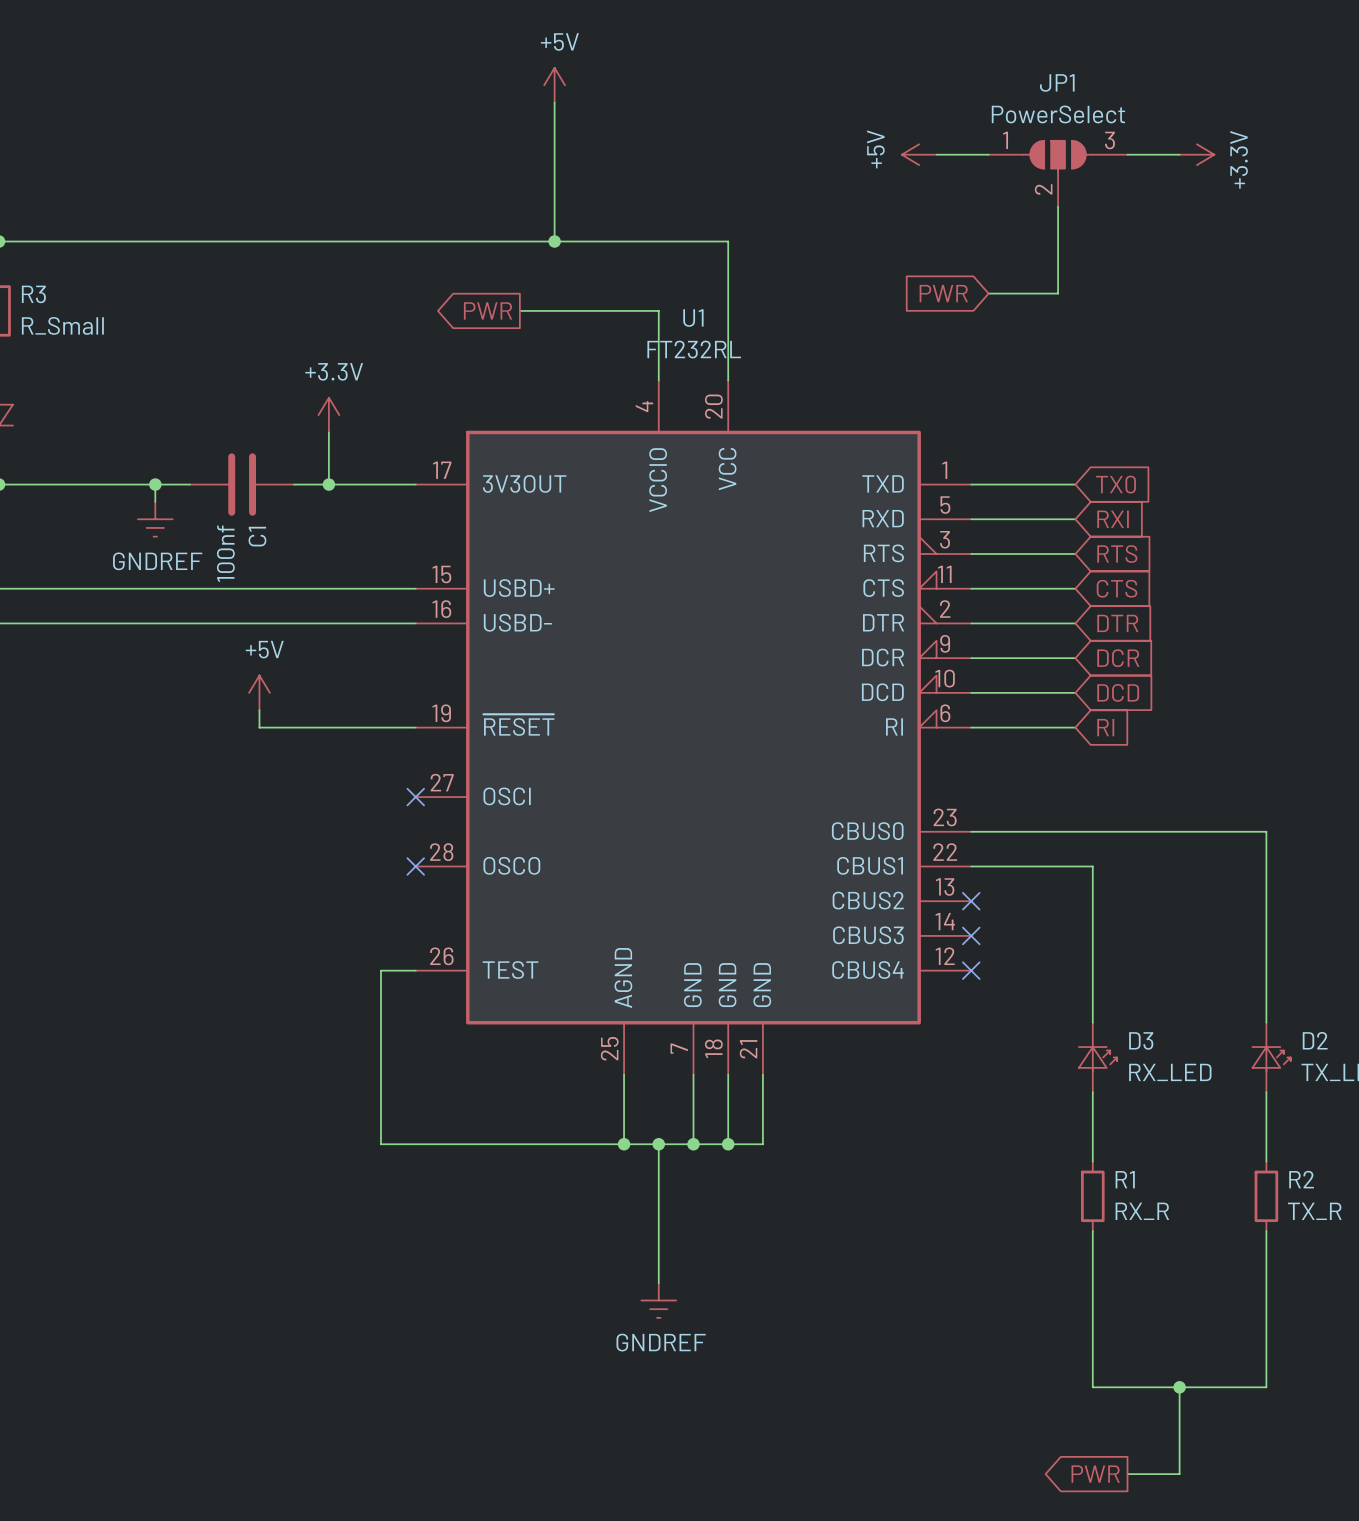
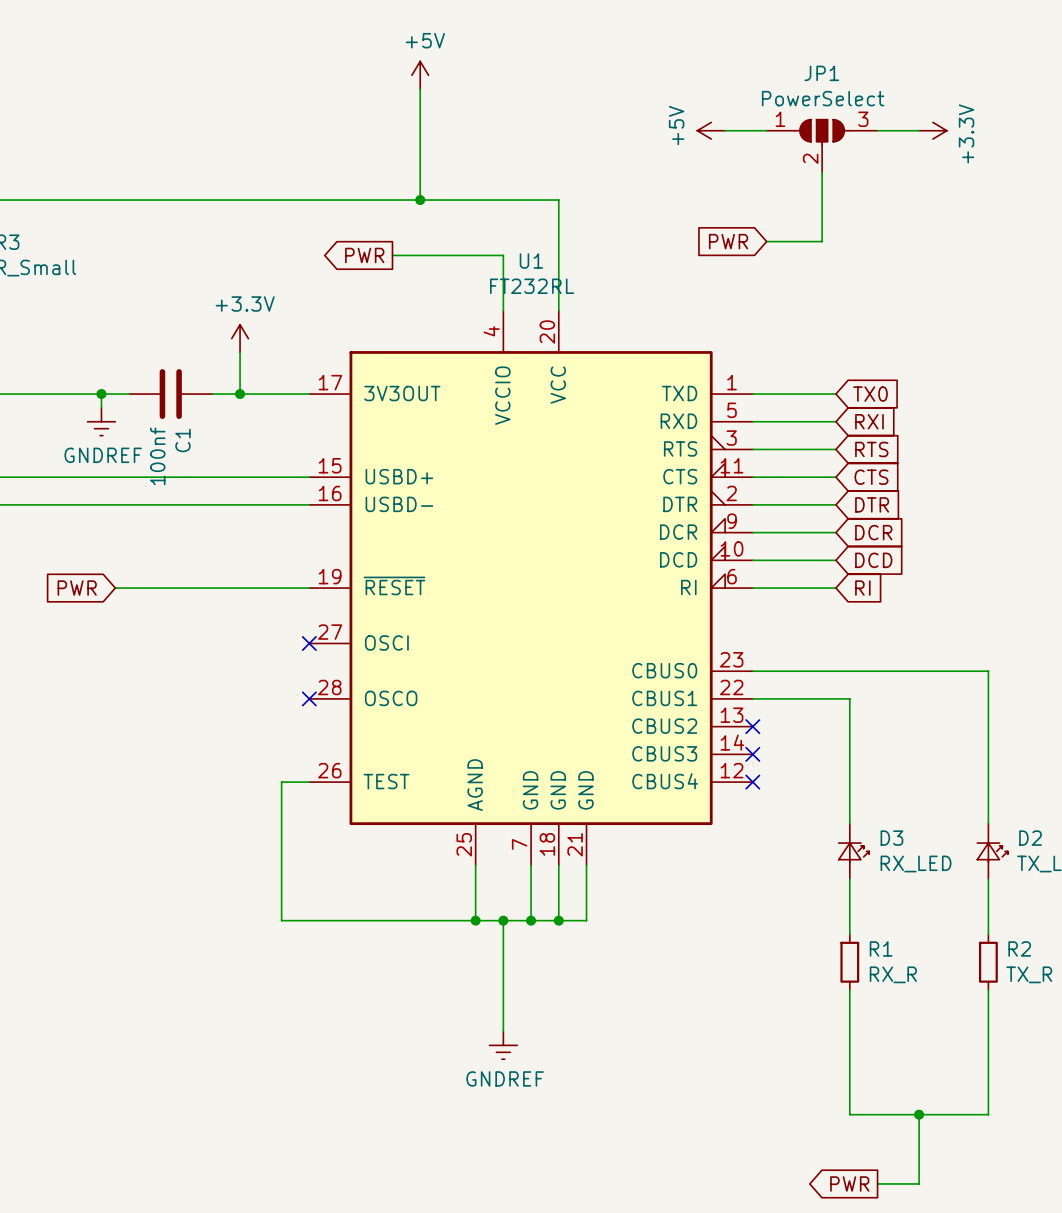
power symbol: +5V (259, 692) -> none
wire: (259, 710) (259, 727) -> (115, 588) (184, 588)
global label: none -> PWR (77, 588)

